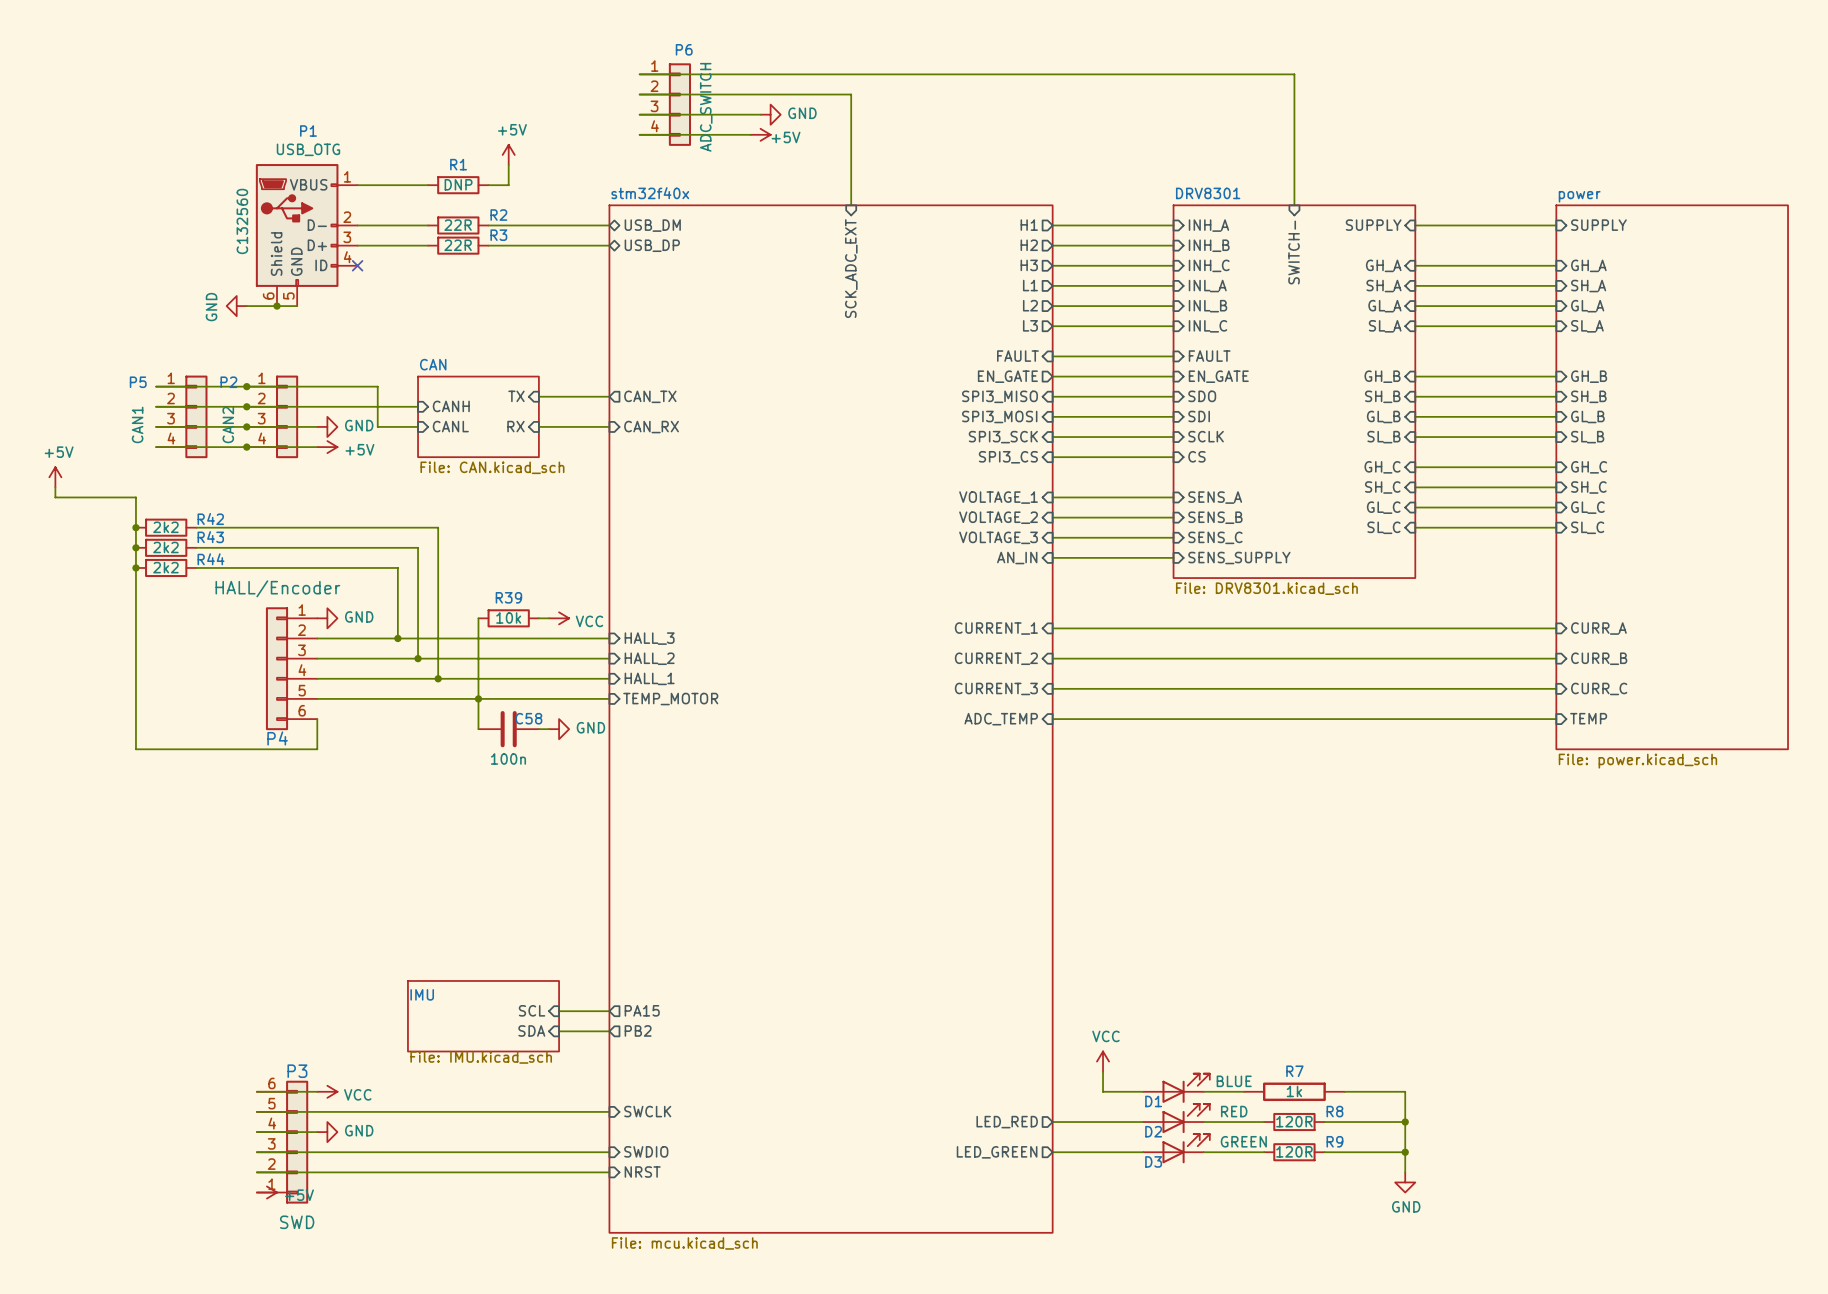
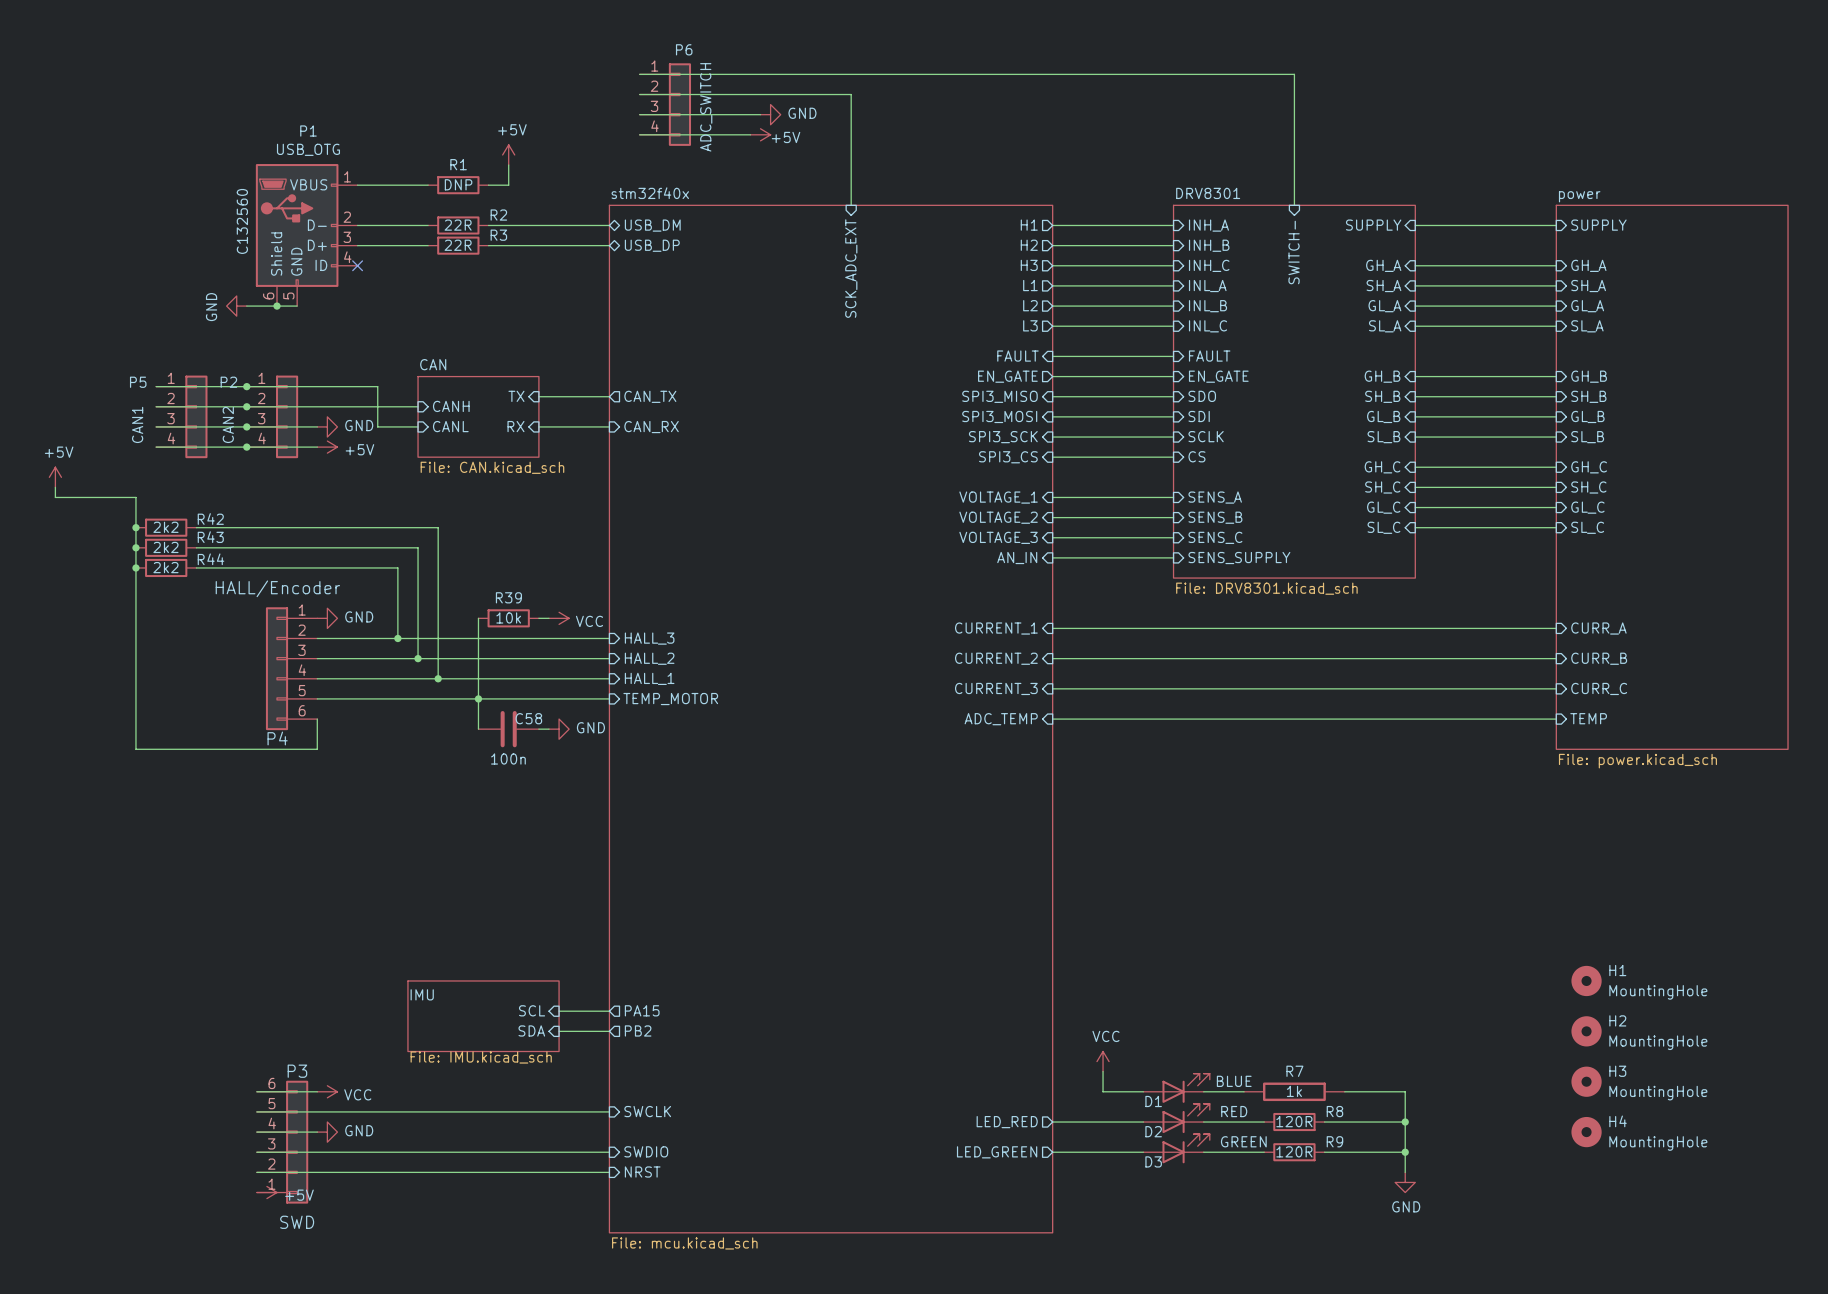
H1: none -> MountingHole (1586, 980)
H2: none -> MountingHole (1586, 1031)
H3: none -> MountingHole (1586, 1081)
H4: none -> MountingHole (1586, 1132)

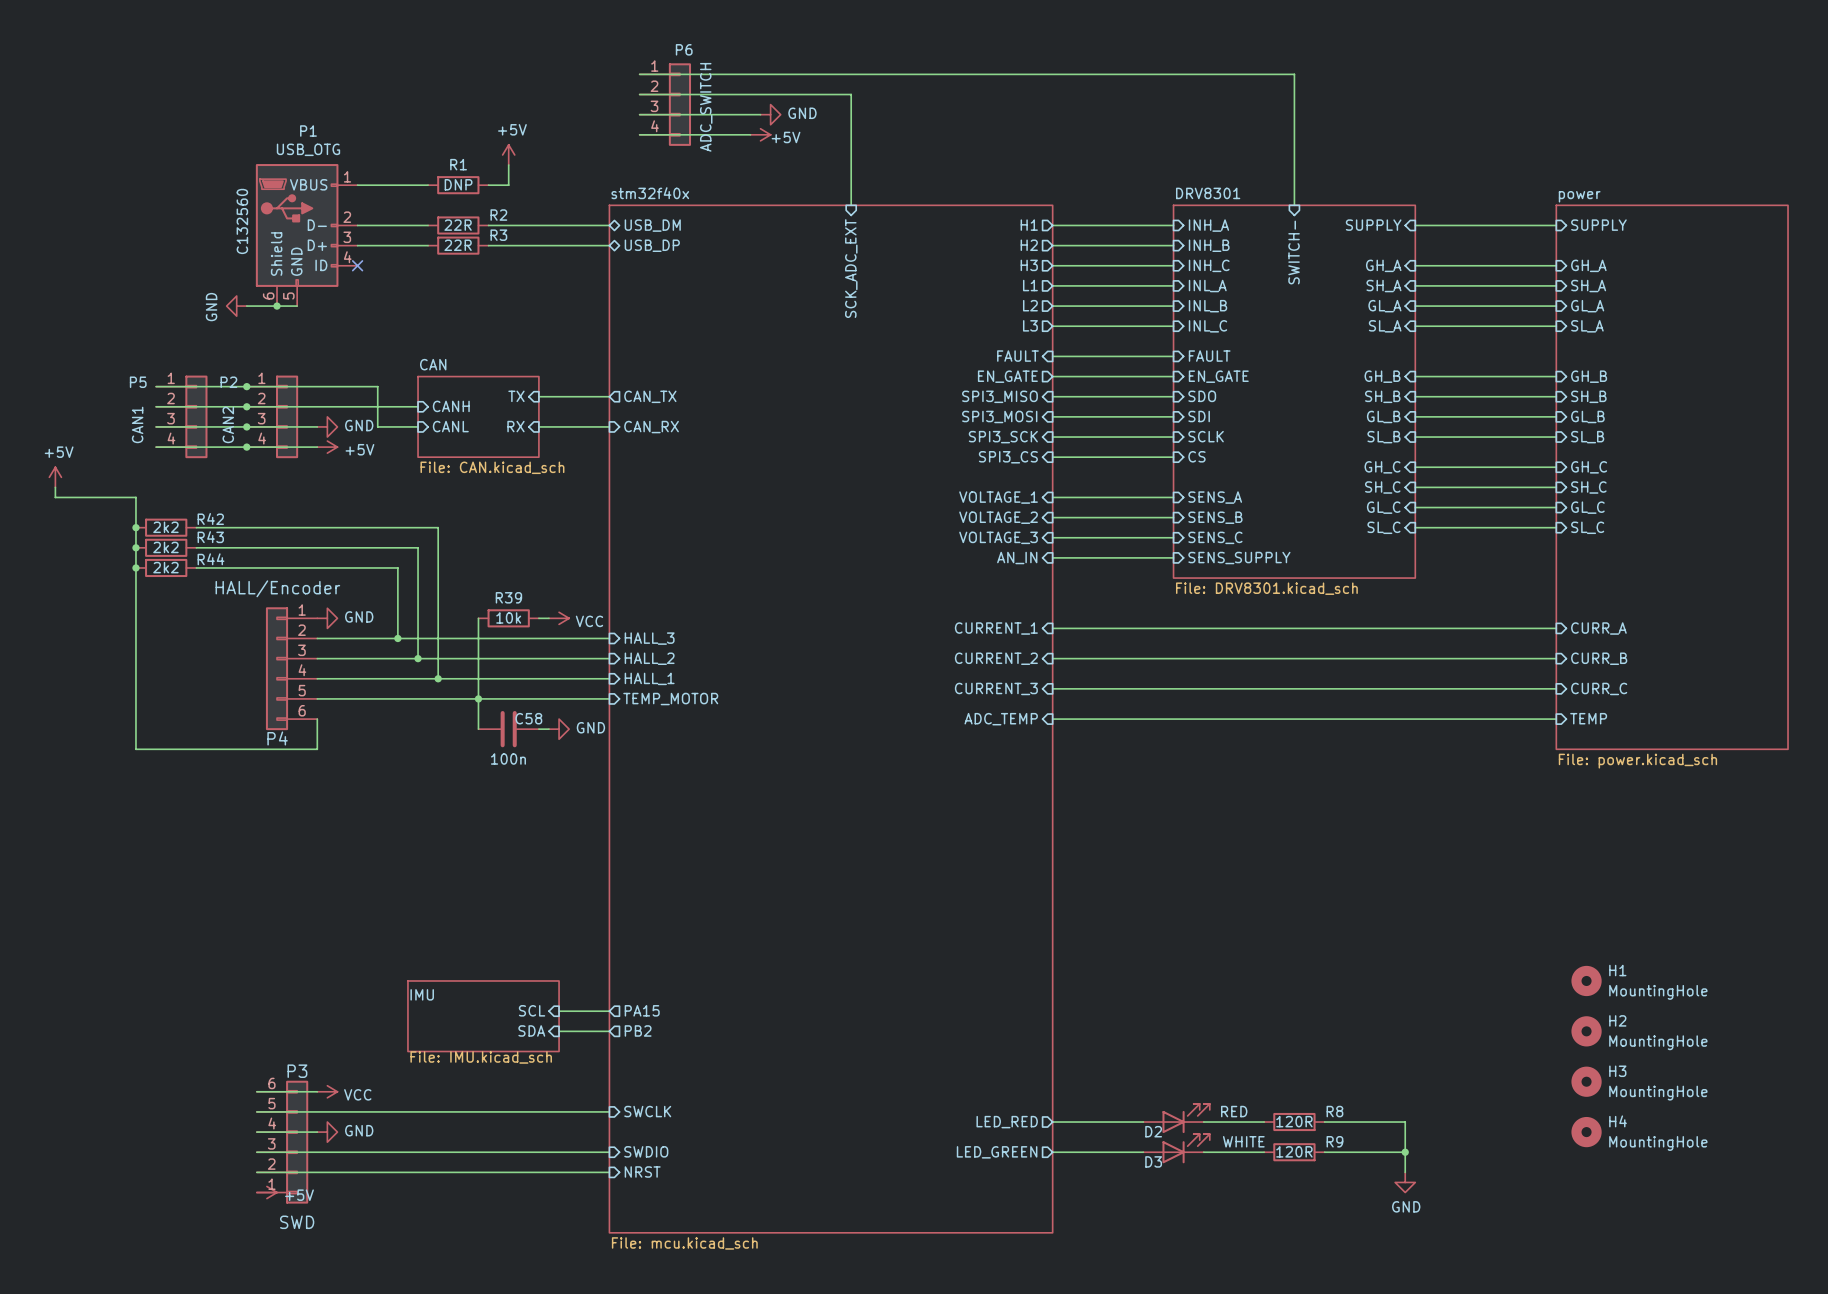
power symbol: VCC (1103, 1061) -> none
wire: (1103, 1071) (1103, 1091) (1143, 1091) -> none
D1: BLUE (1176, 1088) -> none
wire: (1203, 1091) (1244, 1091) -> none
R7: 1k (1294, 1091) -> none
wire: (1344, 1091) (1405, 1091) (1405, 1122) -> none
junction: (1405, 1122) -> none
D3 value: GREEN (1243, 1141) -> WHITE (1243, 1141)

